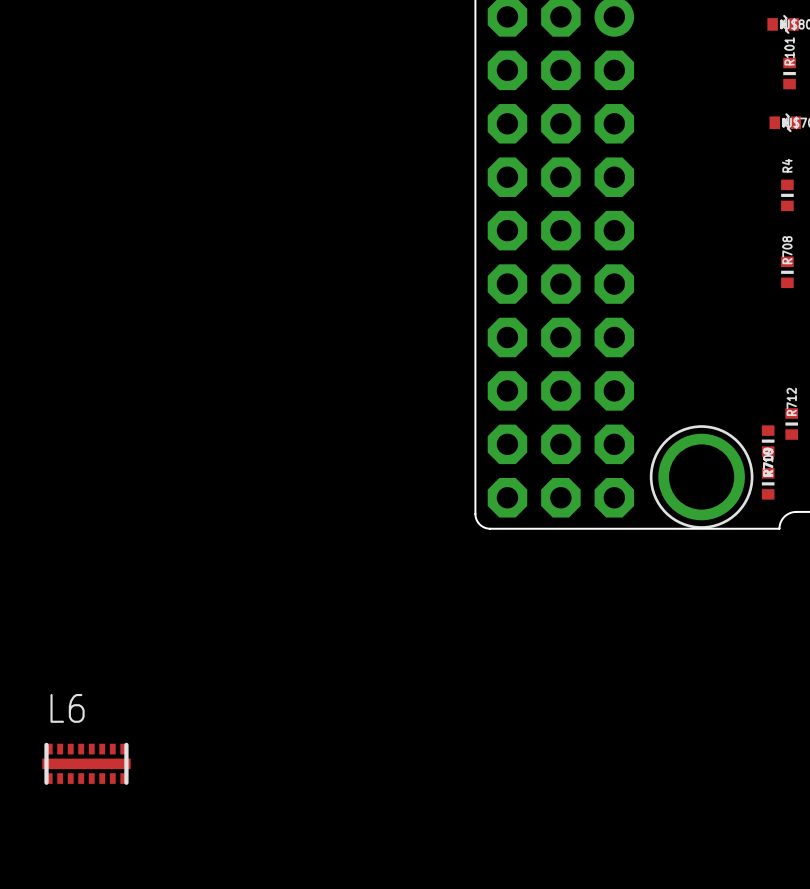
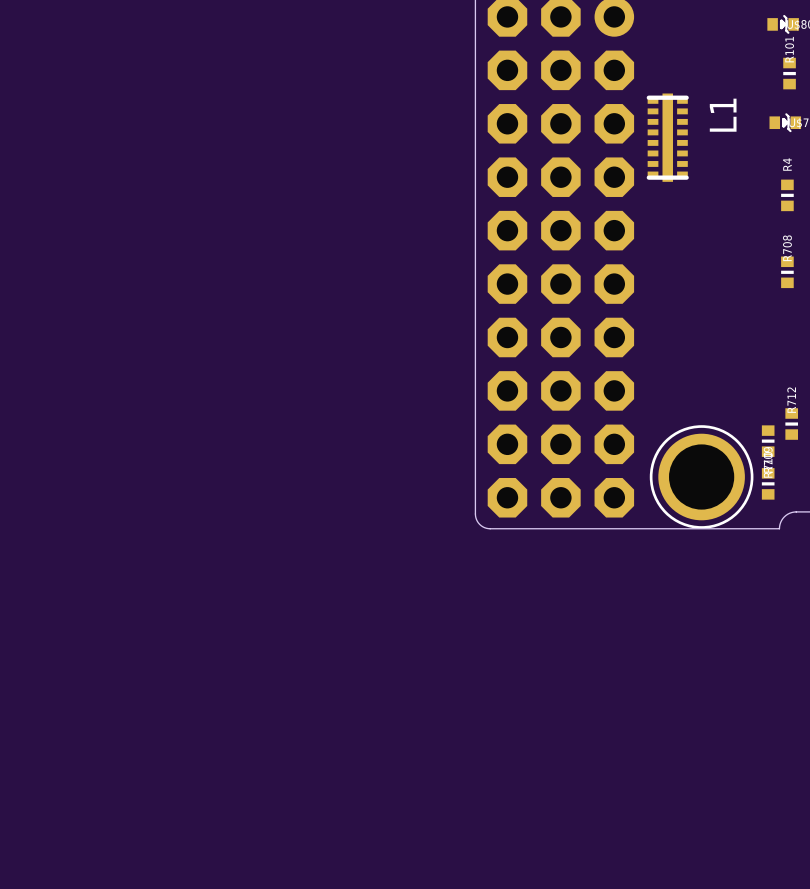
L1: none -> (667, 137)
L6: (86, 763) -> none

